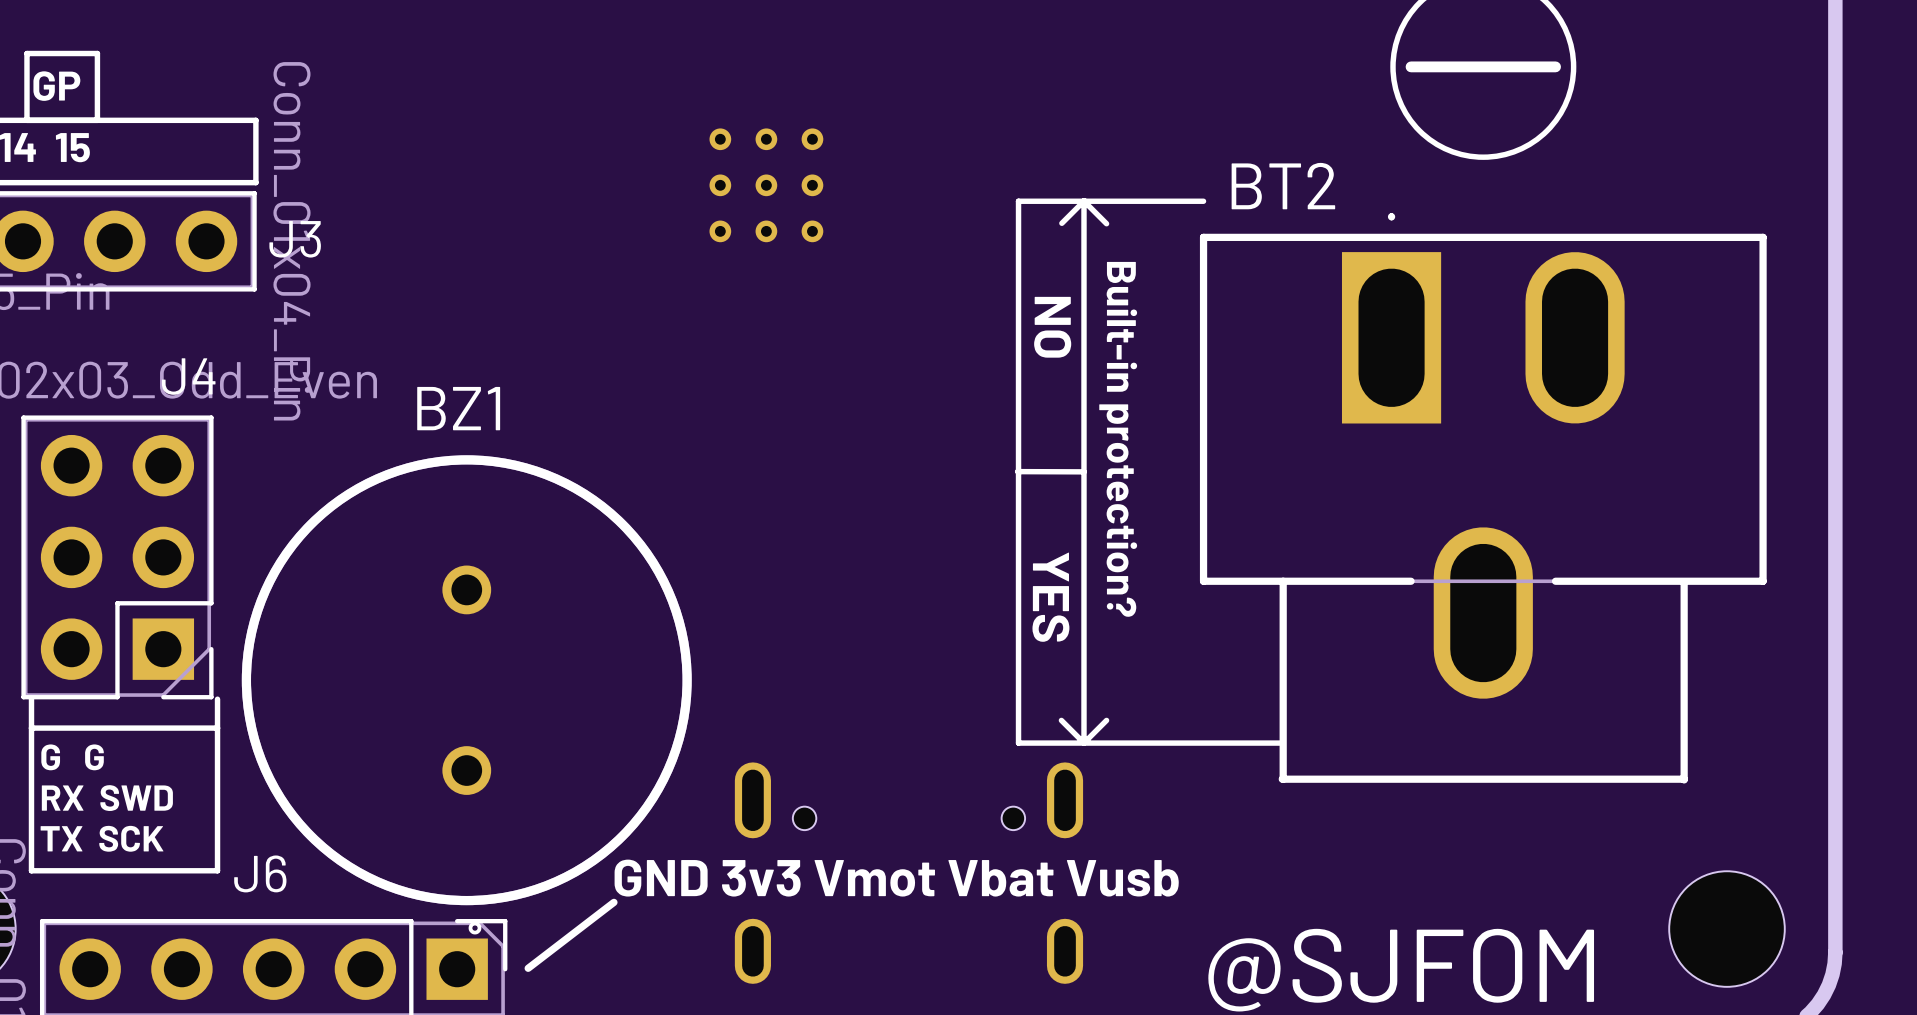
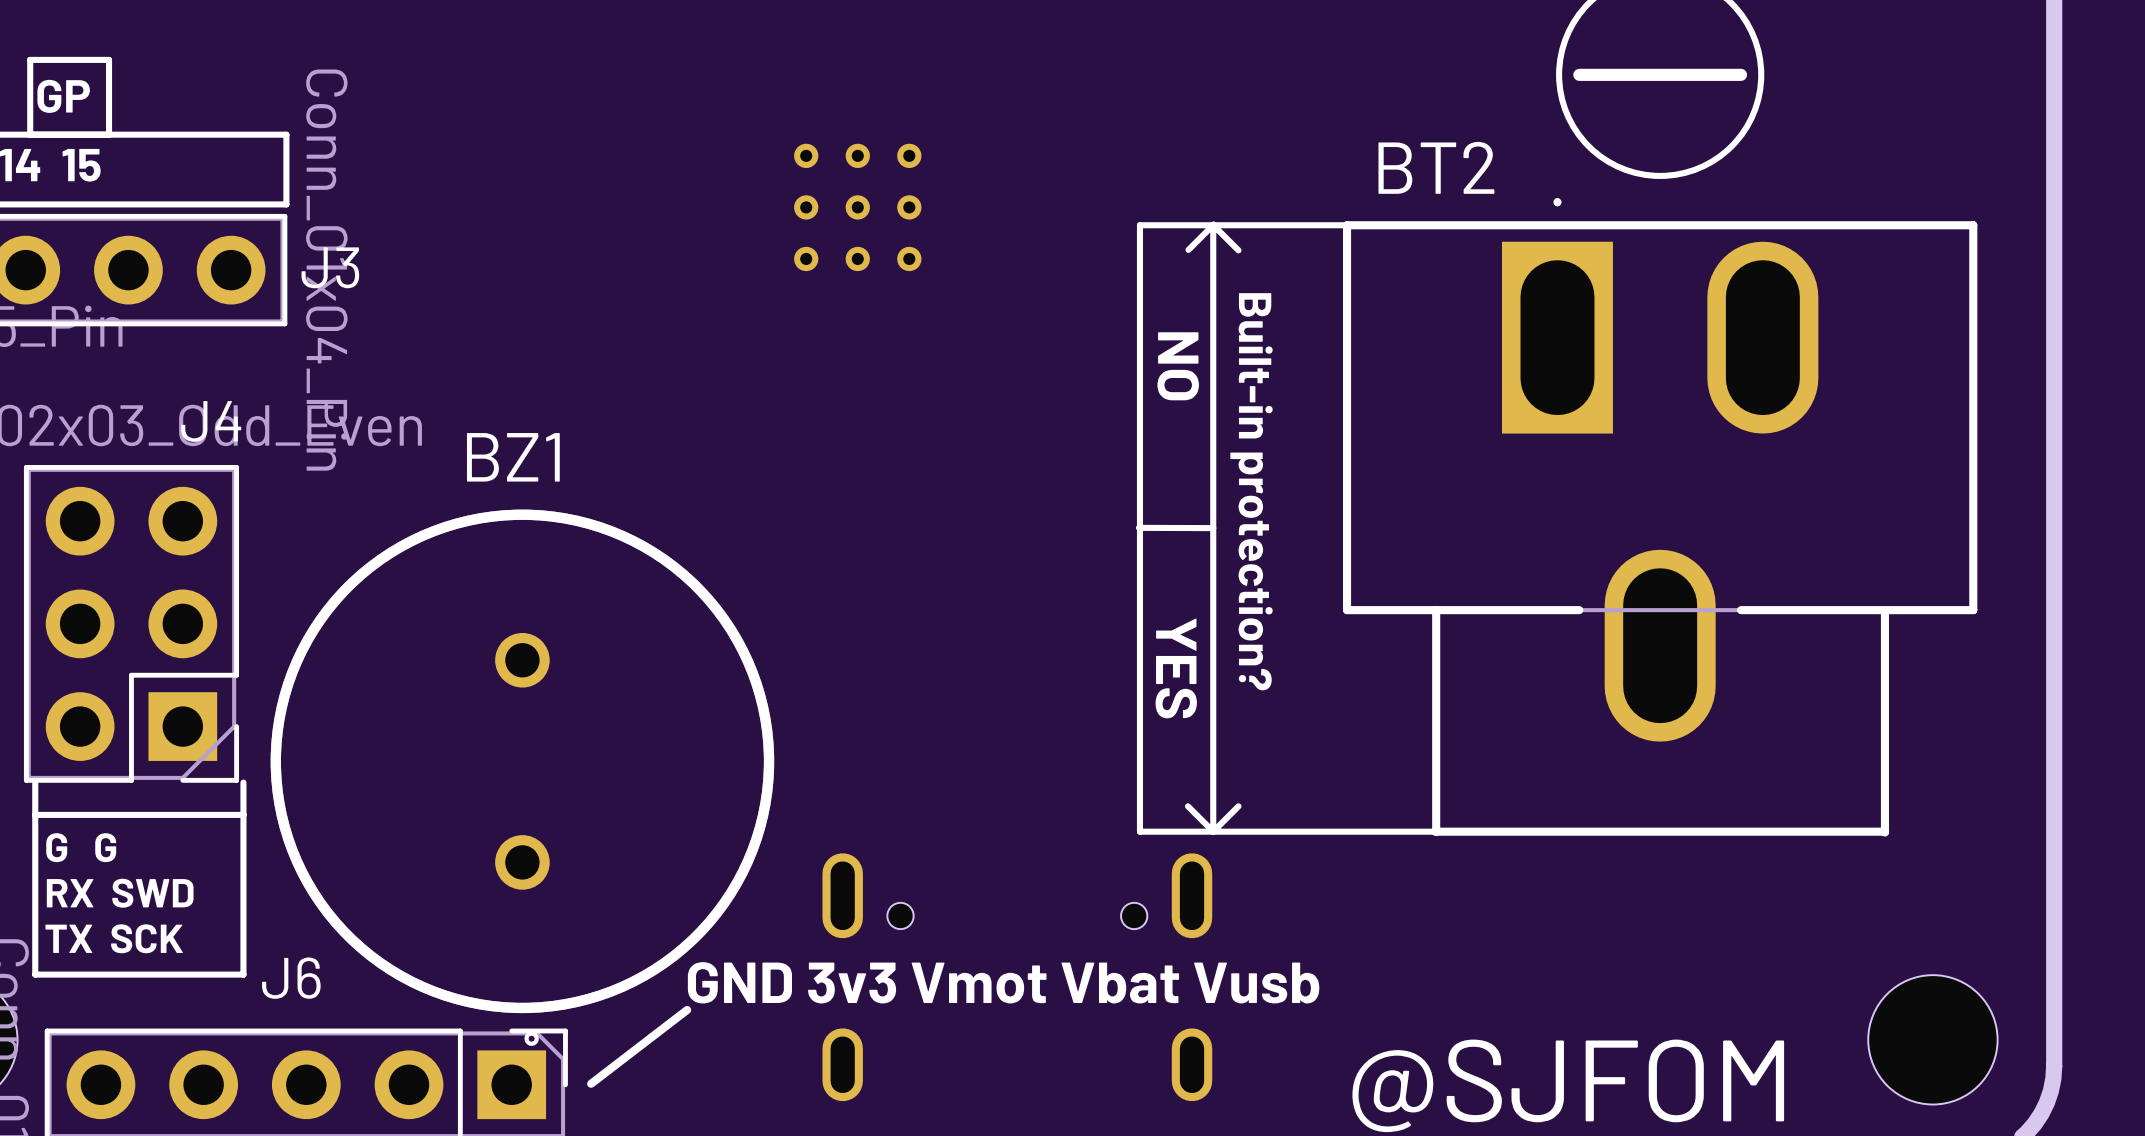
BT2 position: (1483, 498) -> (1660, 517)

